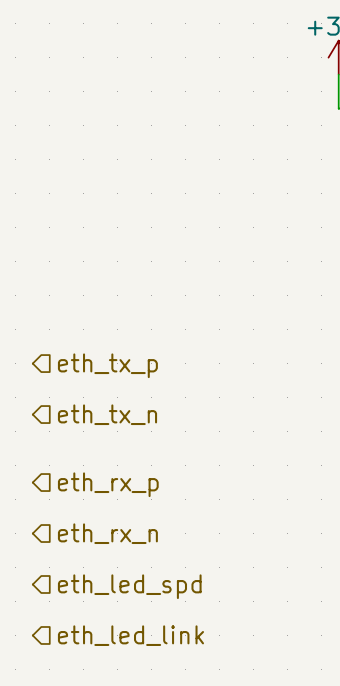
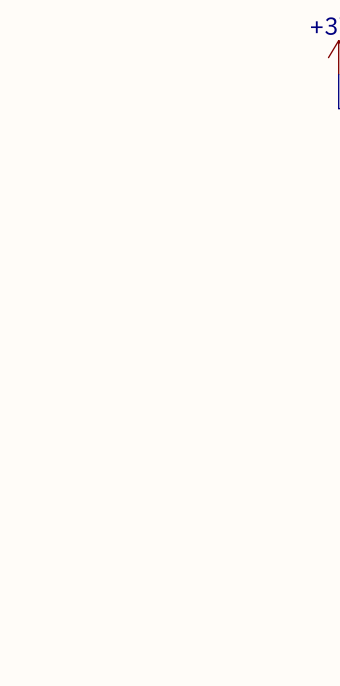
hierarchical label: eth_tx_p (107, 365) -> none
hierarchical label: eth_tx_n (107, 414) -> none
hierarchical label: eth_rx_p (108, 484) -> none
hierarchical label: eth_rx_n (107, 533) -> none
hierarchical label: eth_led_spd (129, 586) -> none
hierarchical label: eth_led_link (130, 635) -> none

